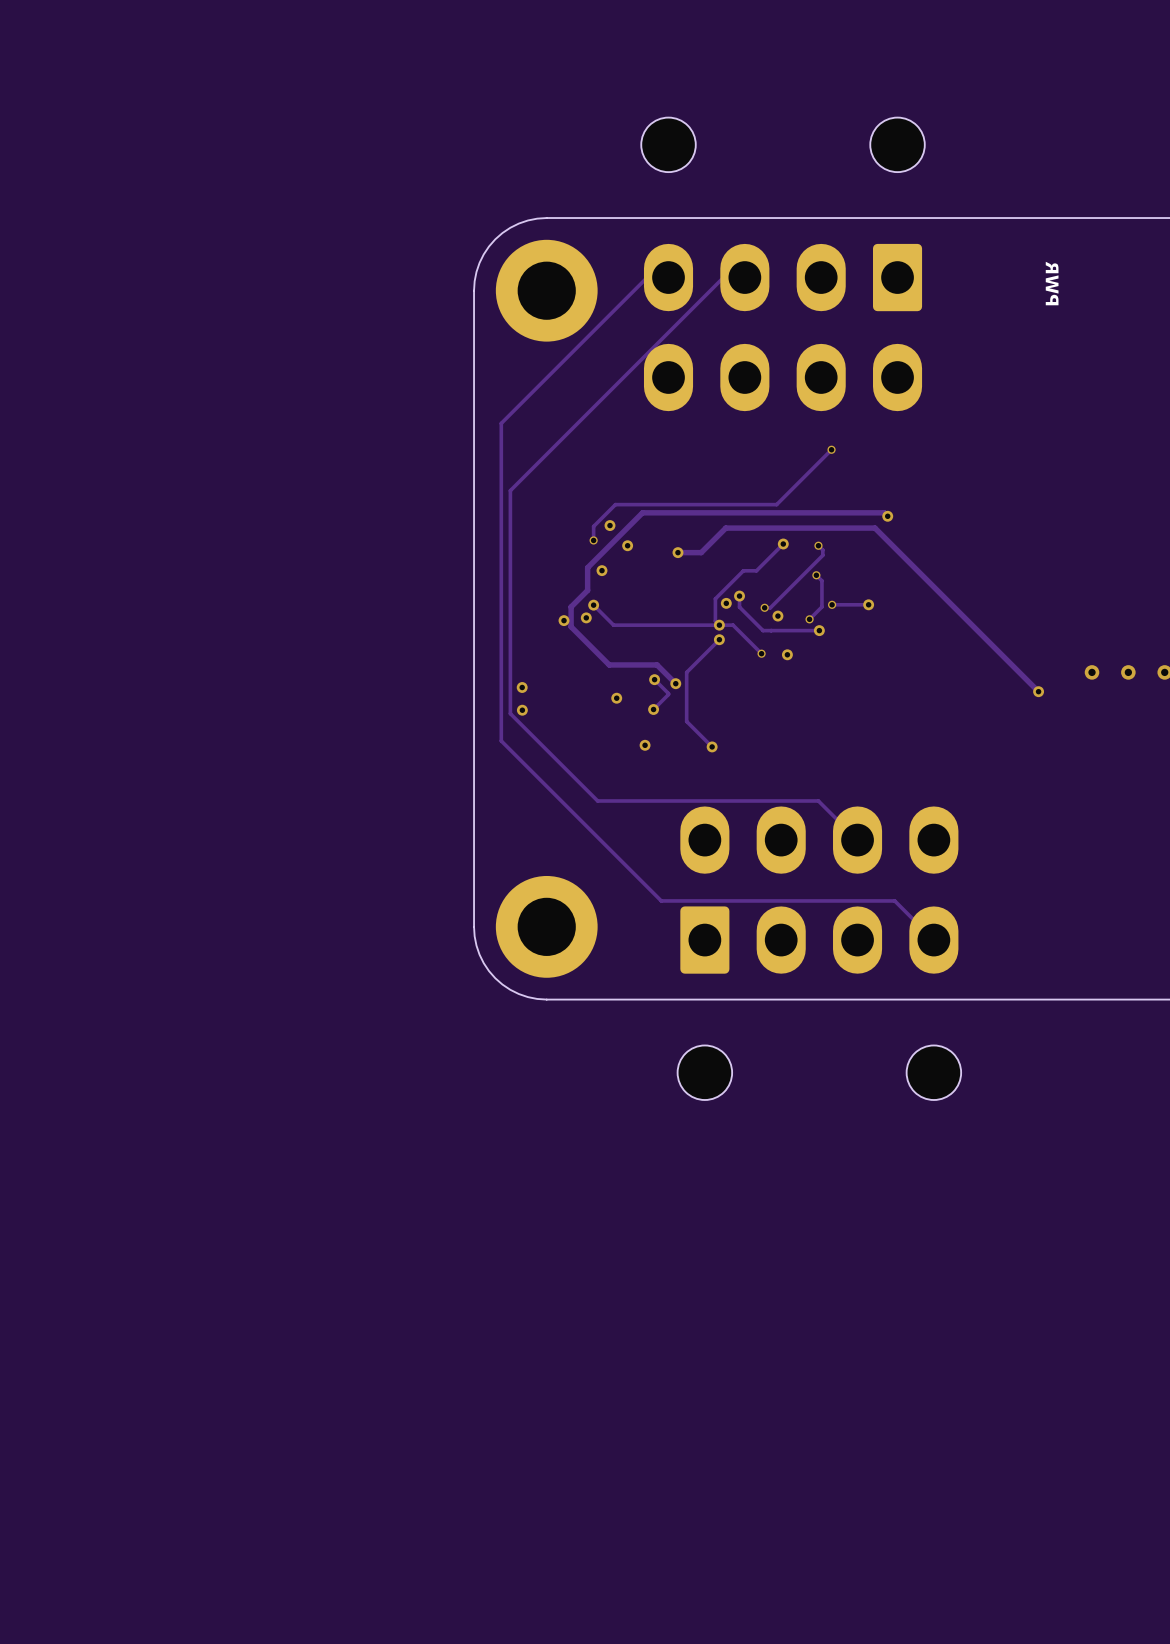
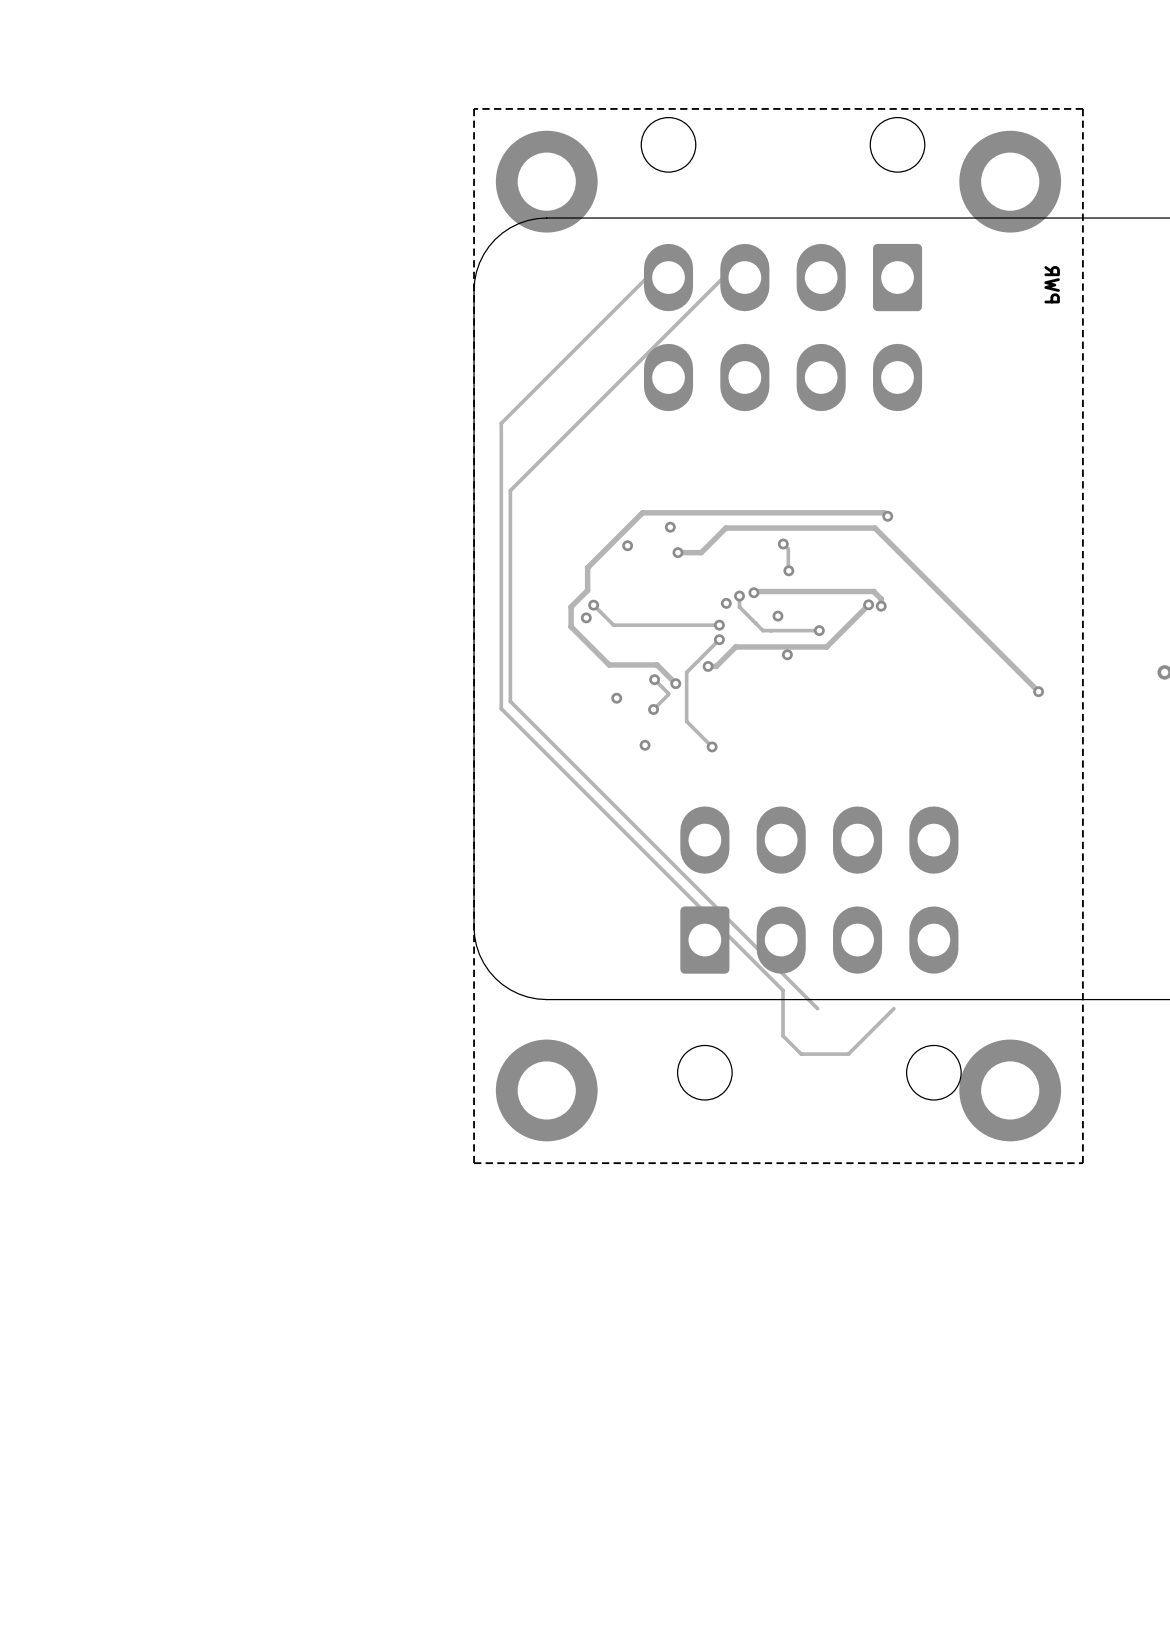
board edge: none -> (1082, 108) (474, 108) (474, 1163) (1082, 1163) (1082, 108)
part: none -> (1010, 181)
part position: (546, 290) -> (546, 181)
track: (831, 449) (776, 504) (615, 504) (593, 526) (593, 540) -> none
via: (831, 449) -> none
via: (609, 525) -> none
via: none -> (670, 527)
via: (593, 540) -> none
track: (783, 544) (756, 570) (743, 570) (715, 598) (715, 621) (719, 625) (733, 625) (761, 653) -> (783, 544) (788, 549) (788, 570)
track: (818, 545) (822, 550) (822, 555) (770, 607) (764, 607) -> none
via: (818, 545) -> none
via: (601, 570) -> none
via: none -> (788, 570)
track: (816, 575) (821, 580) (821, 606) (809, 619) -> none
via: (816, 575) -> none
track: none -> (753, 592) (873, 591) (881, 599) (880, 606)
via: none -> (753, 592)
via: (832, 604) -> none
track: (868, 604) (832, 604) -> none
track: none -> (864, 605) (864, 608) (826, 646) (735, 646) (716, 666) (708, 666)
via: none -> (881, 606)
via: (764, 607) -> none
via: (809, 619) -> none
via: (564, 620) -> none
via: (761, 653) -> none
via: none -> (708, 666)
via: (1092, 672) -> none
via: (1128, 672) -> none
via: (522, 687) -> none
track: (510, 701) (510, 713) (597, 800) (818, 800) (857, 840) -> (510, 701) (817, 1008)
track: (501, 708) (501, 740) (661, 900) (894, 900) (933, 940) -> (501, 708) (783, 990) (783, 1035) (801, 1054) (848, 1054) (893, 1008)
via: (522, 710) -> none
part position: (546, 926) -> (546, 1090)
part: none -> (1010, 1090)

